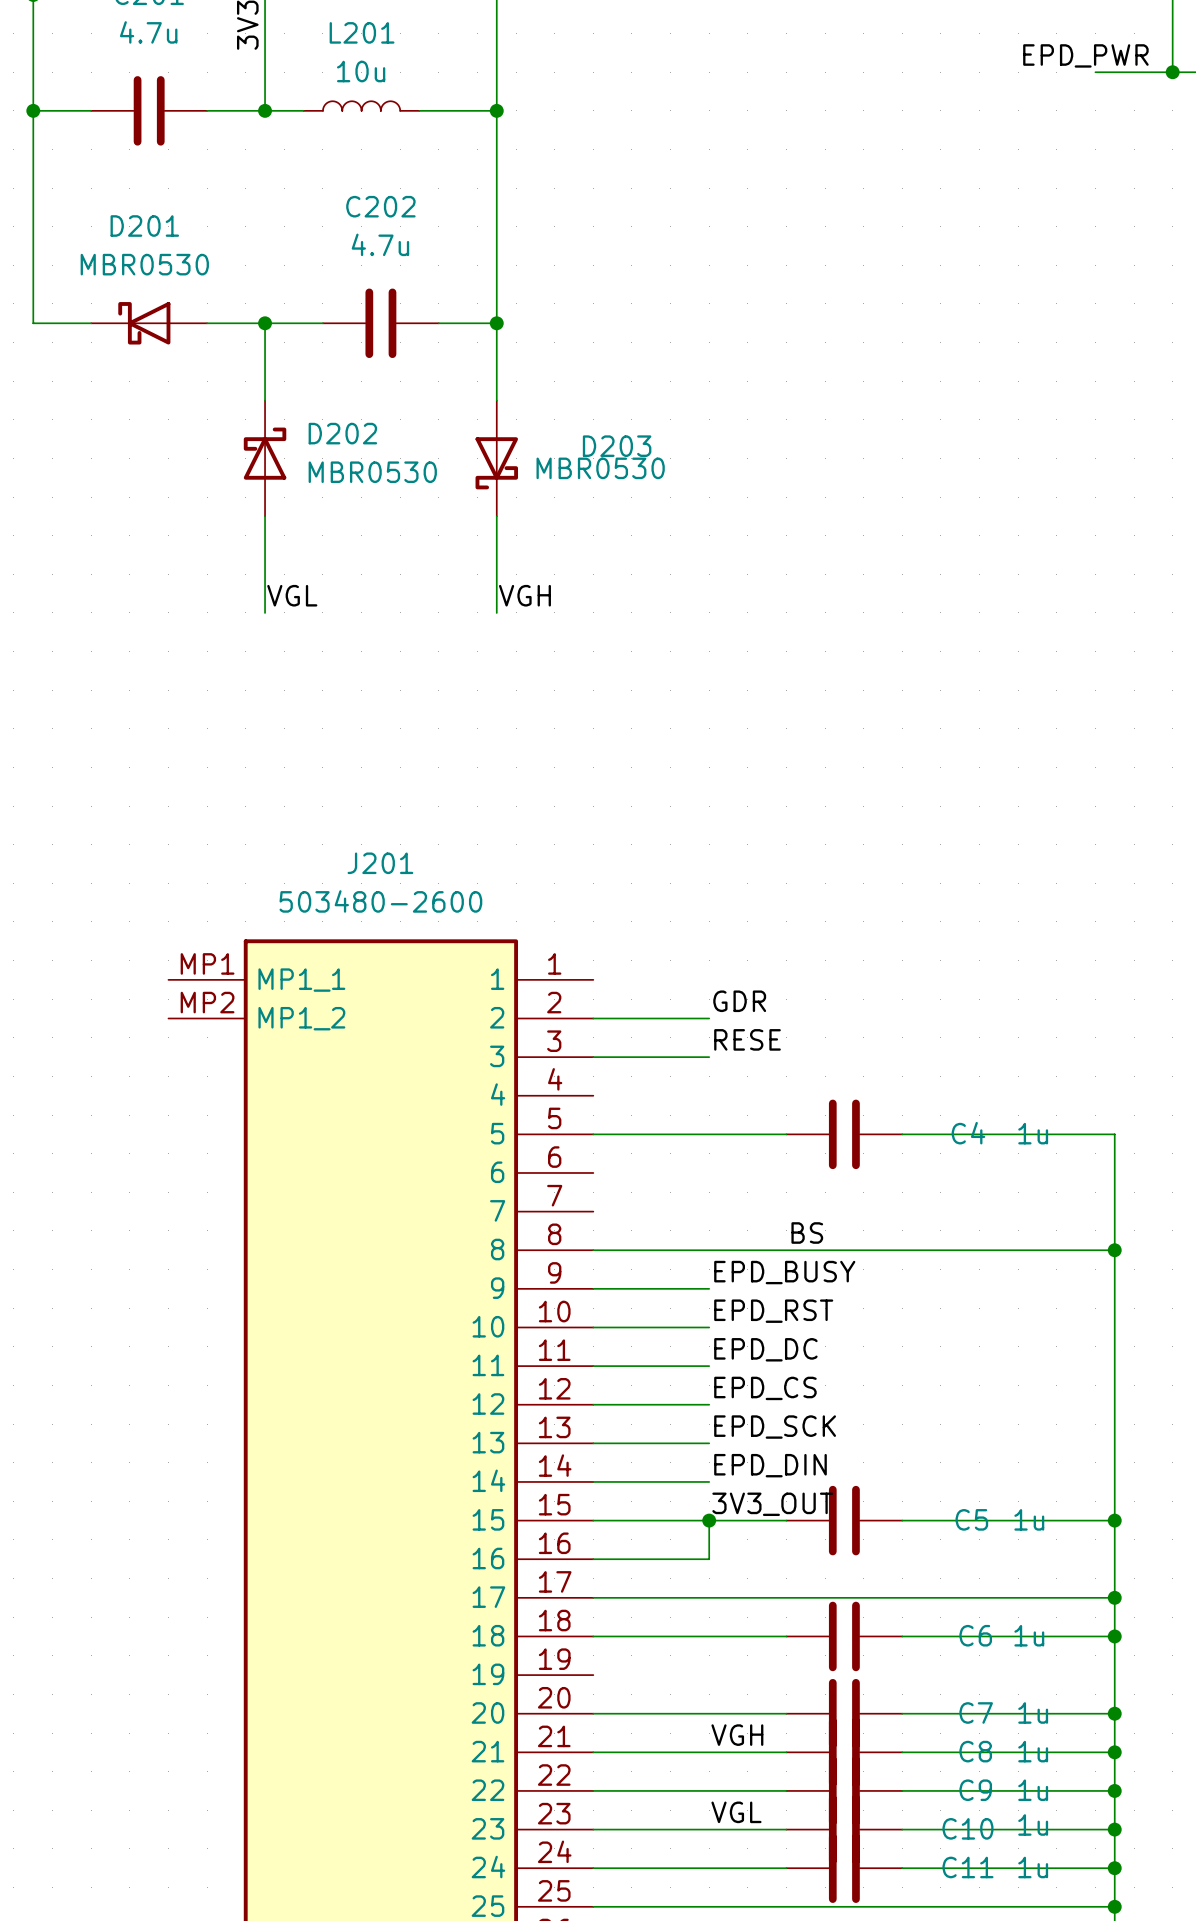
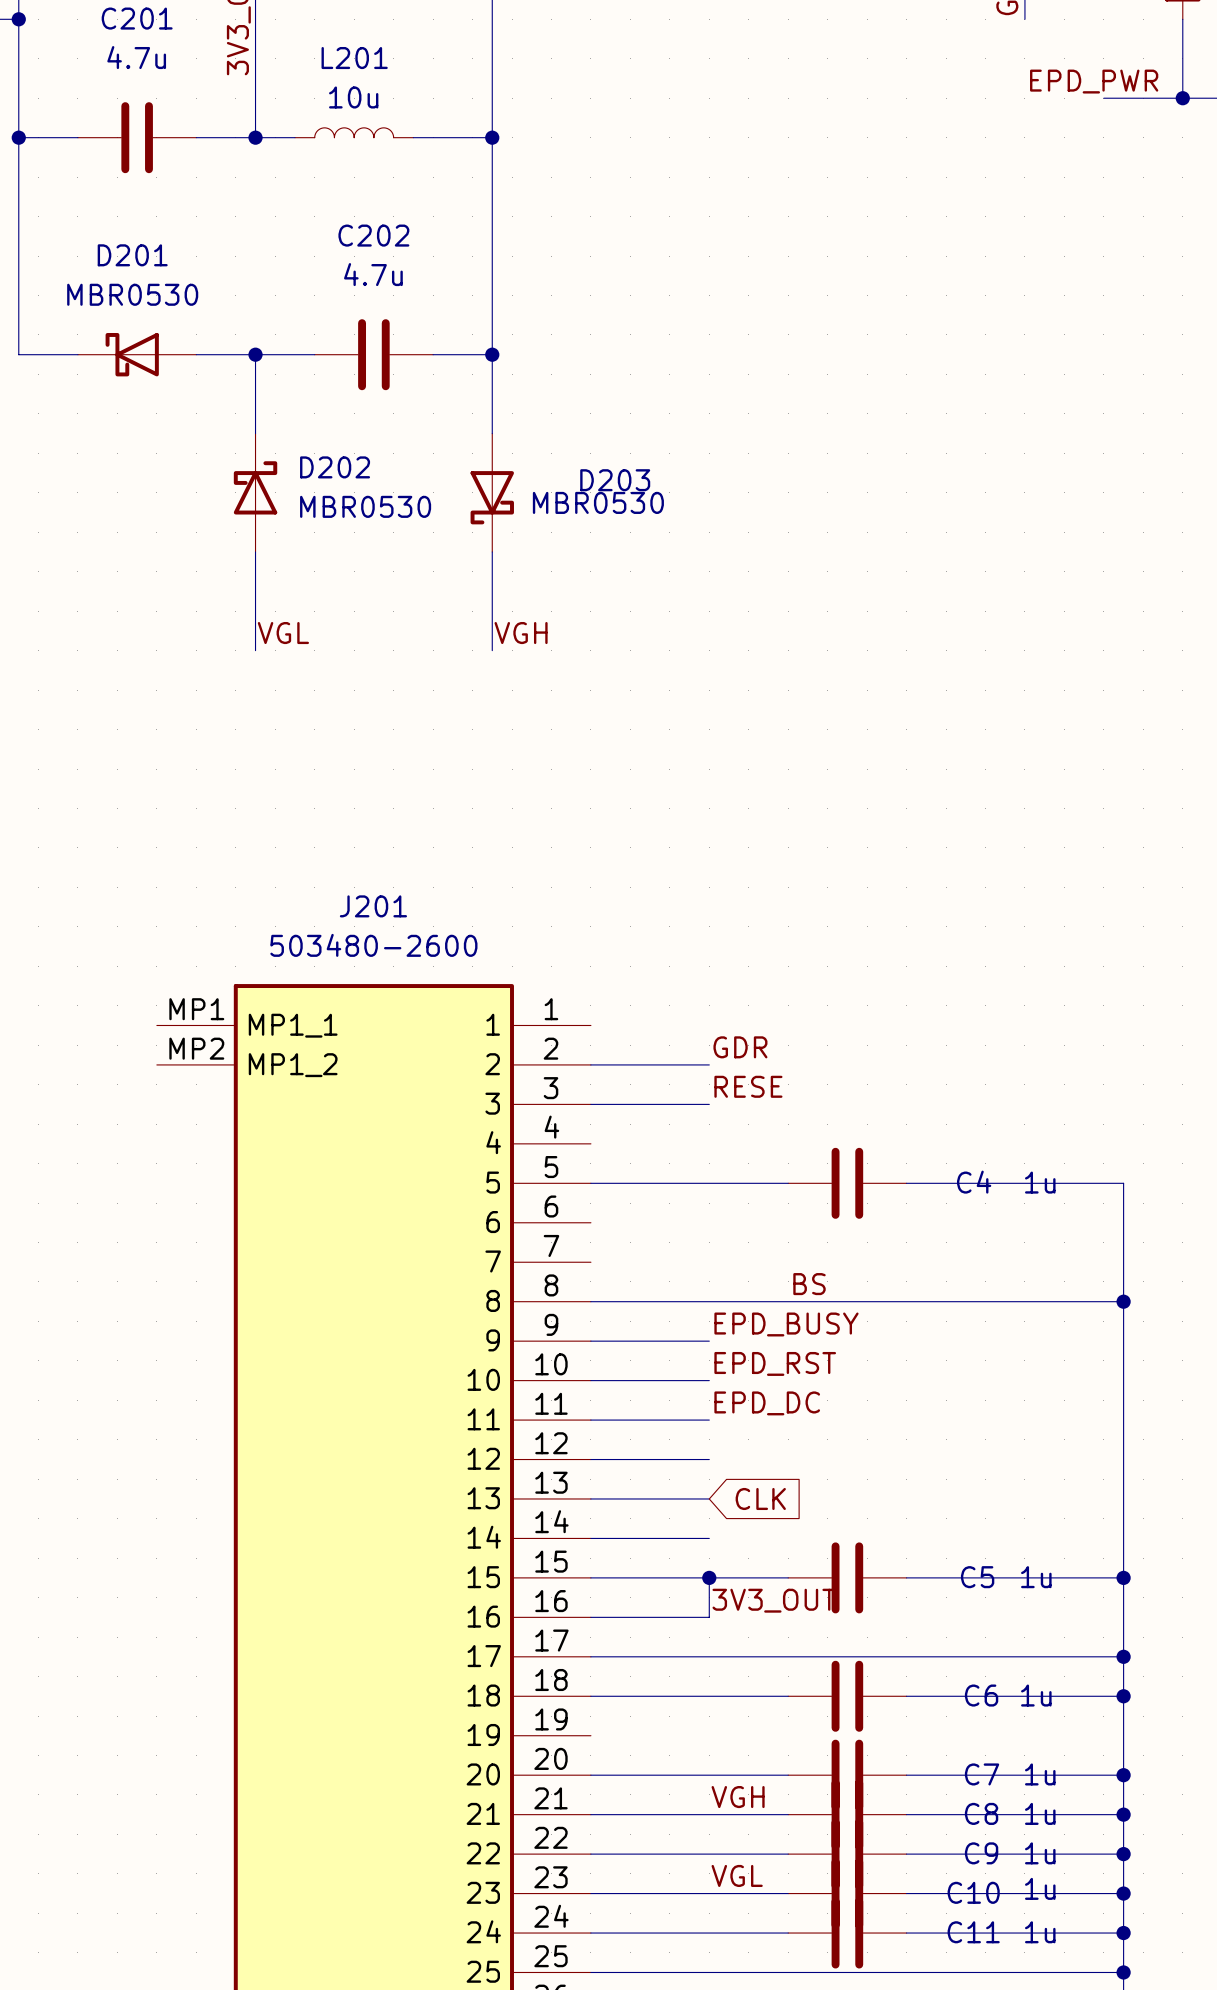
label: EPD_CS (765, 1388) -> none
label: EPD_SCK (775, 1427) -> none
global label: none -> CLK (760, 1498)
label: EPD_DIN (770, 1465) -> none
label position: 3V3_OUT (772, 1504) -> 3V3_OUT (774, 1600)

